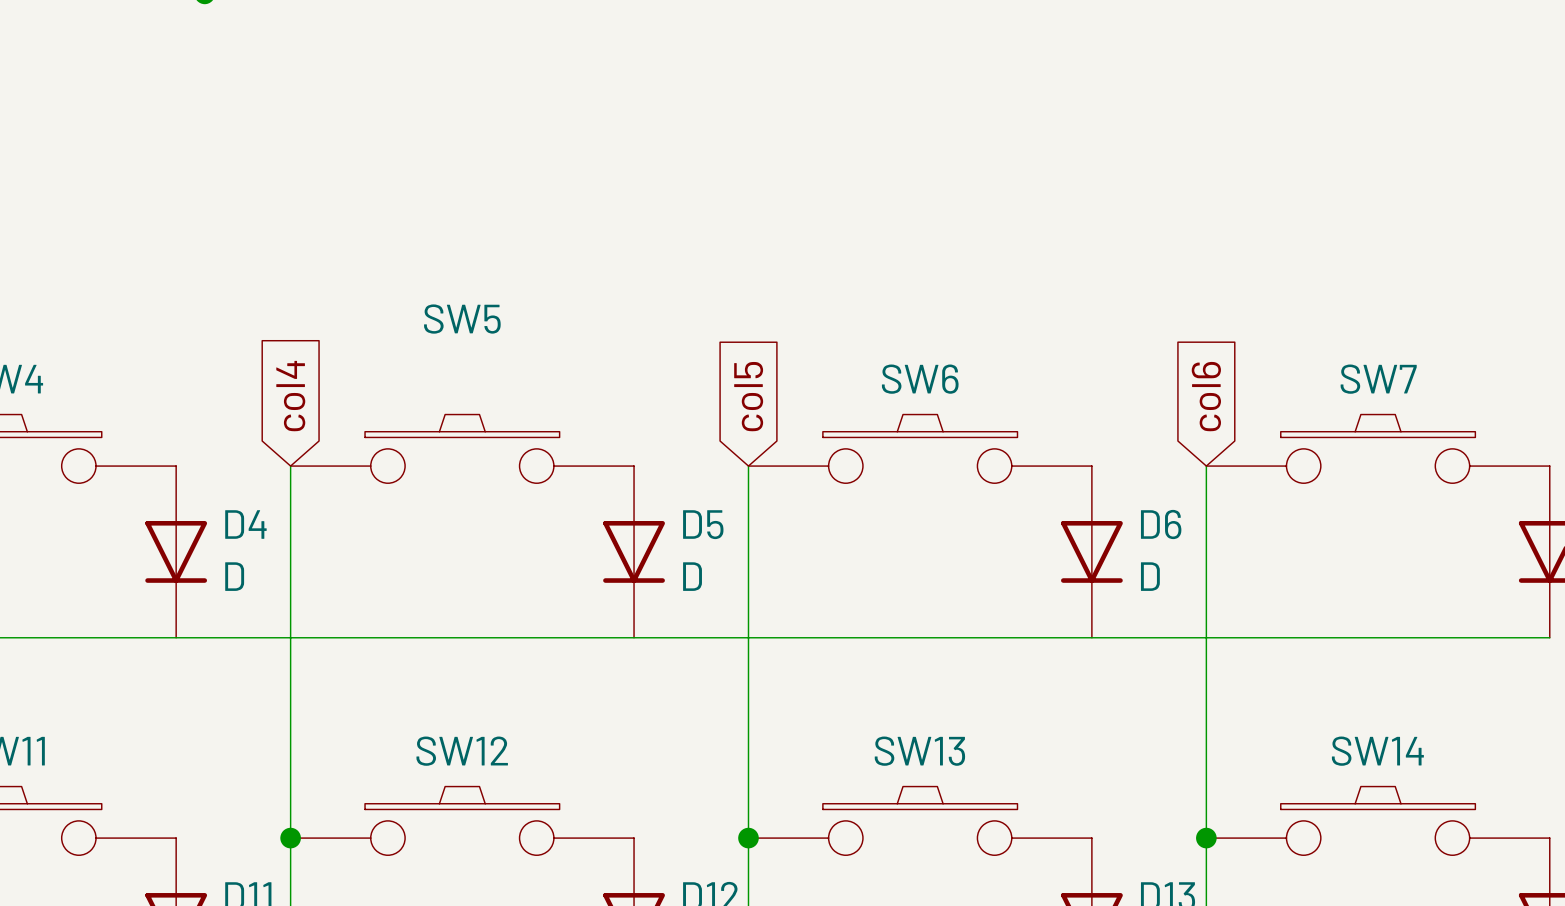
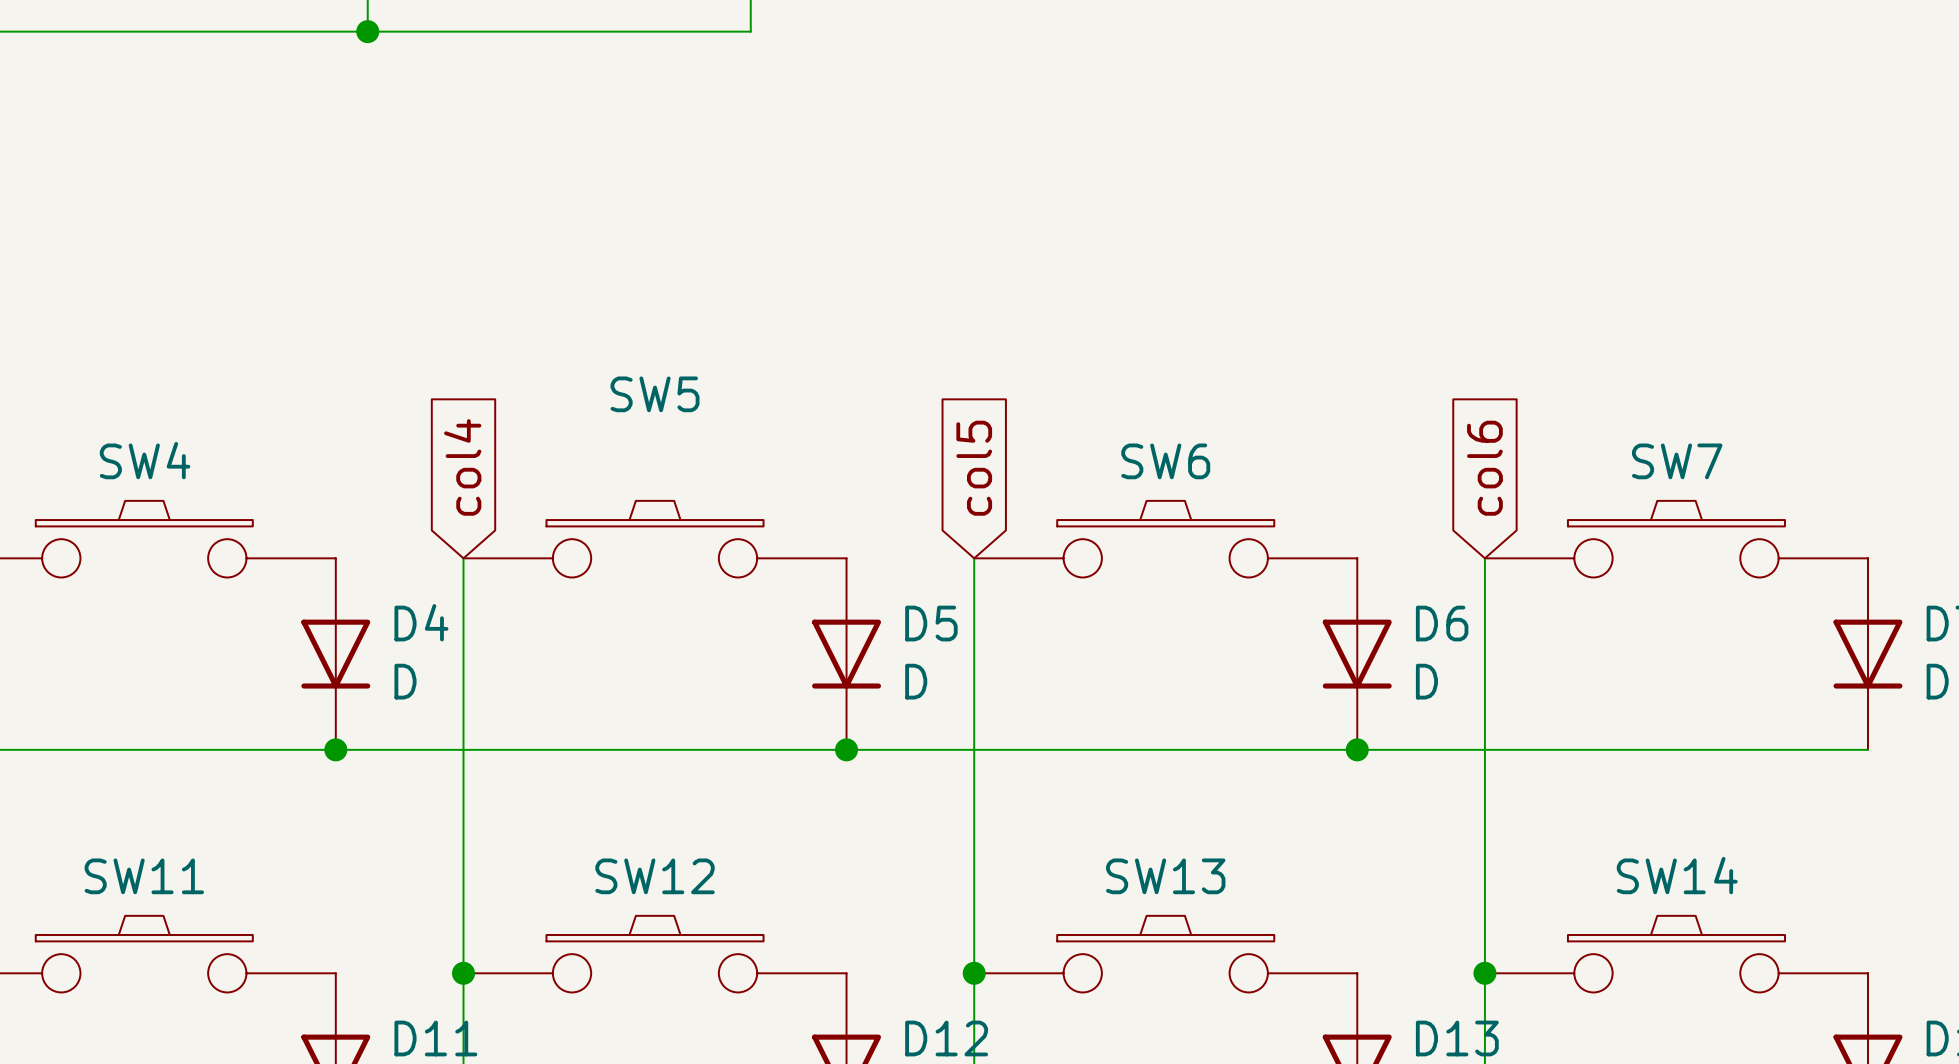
junction: none -> (335, 749)
junction: none -> (846, 749)
junction: none -> (1357, 749)

